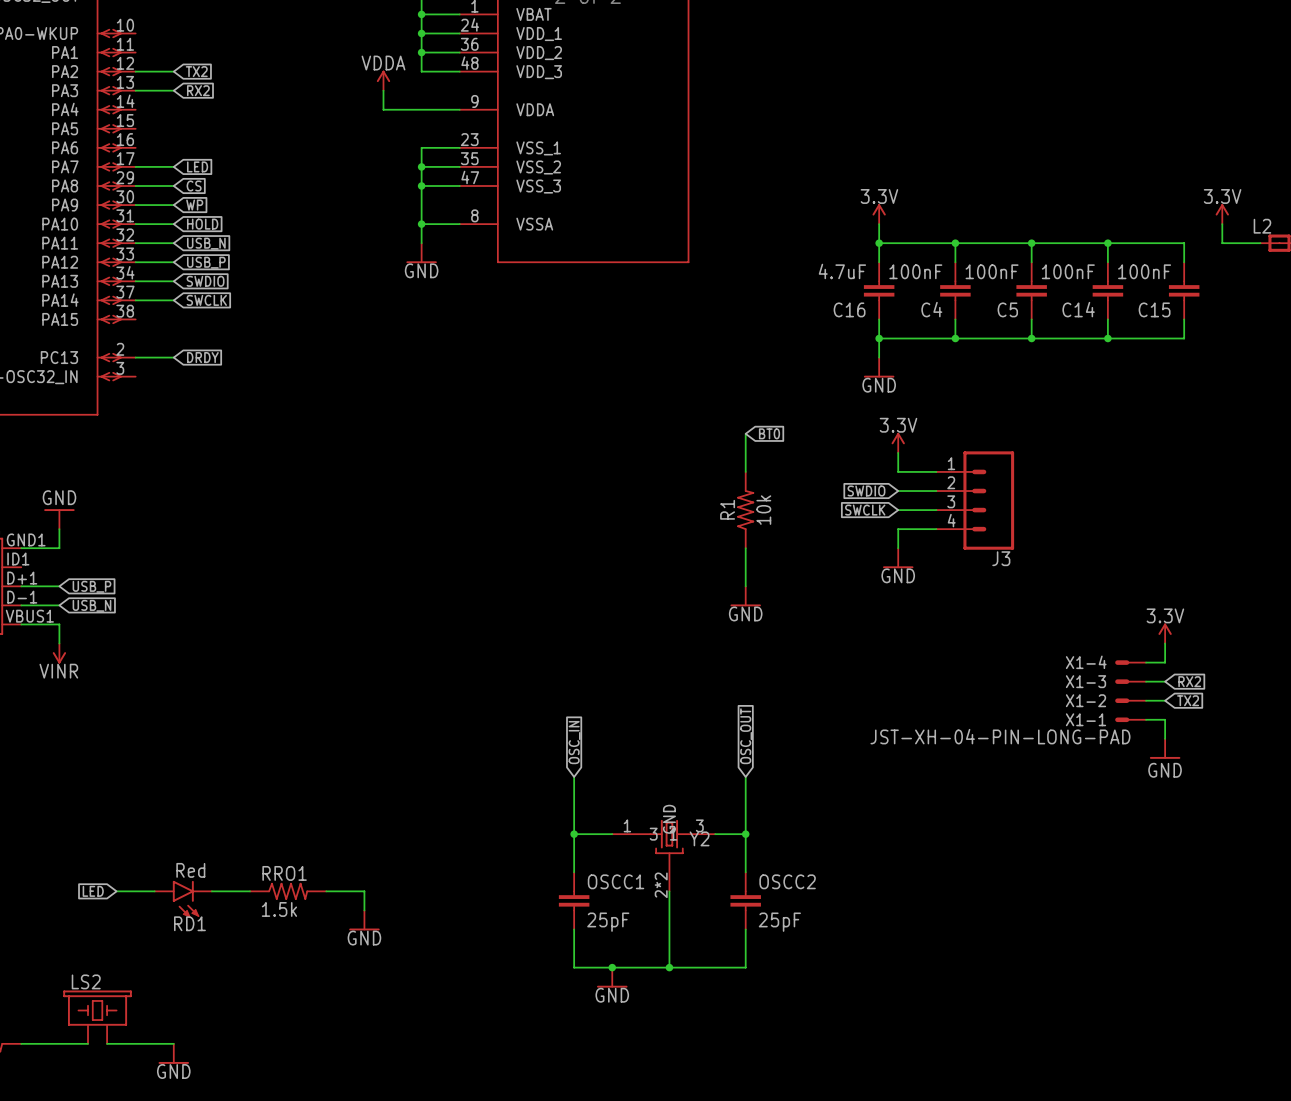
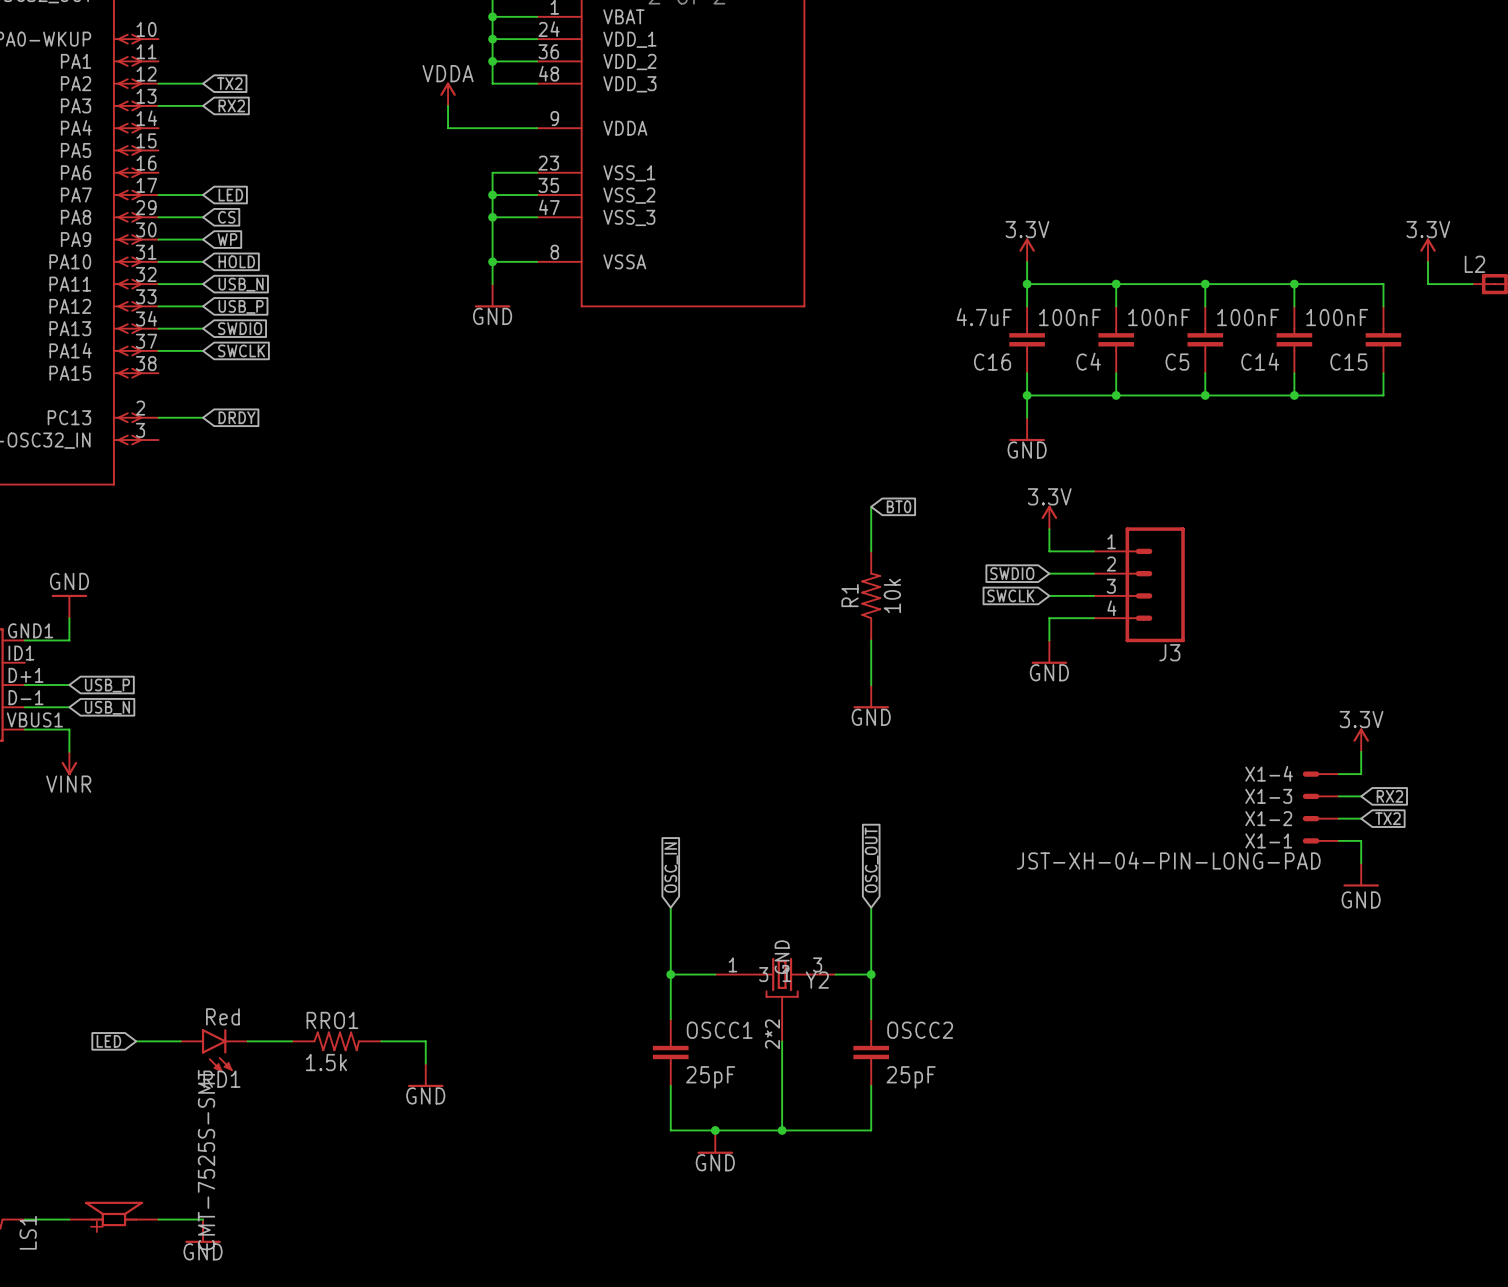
LS2: (97, 1017) -> none
LS1: none -> CMT-7525S-SMT (113, 1213)

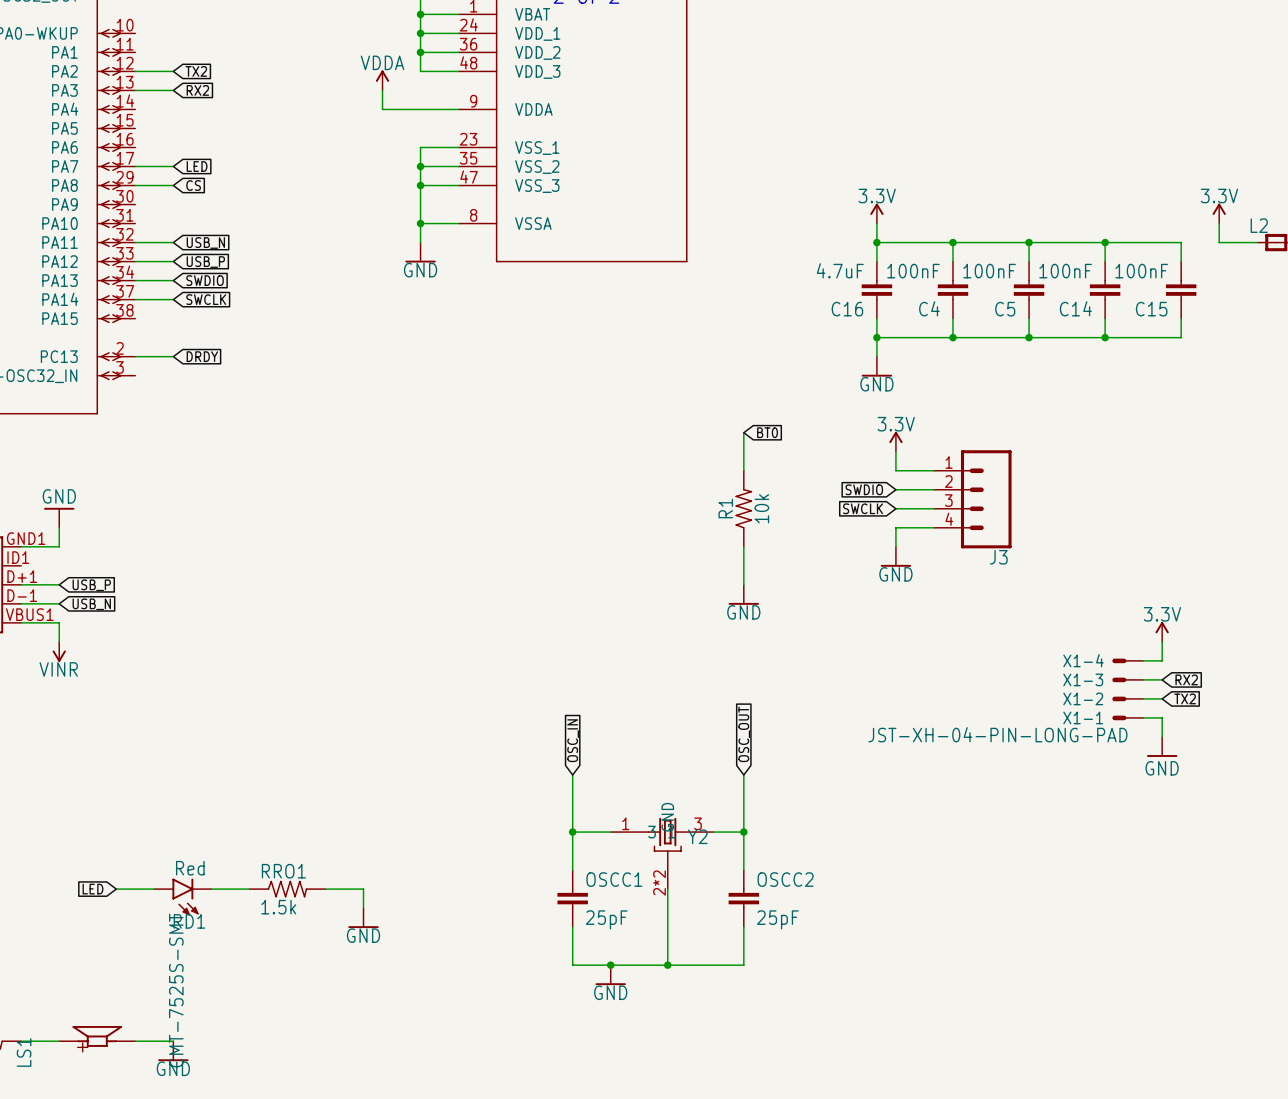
wire: (158, 239) (203, 239) -> none
global label: WP (227, 239) -> none
wire: (158, 261) (203, 261) -> none
global label: HOLD (236, 261) -> none

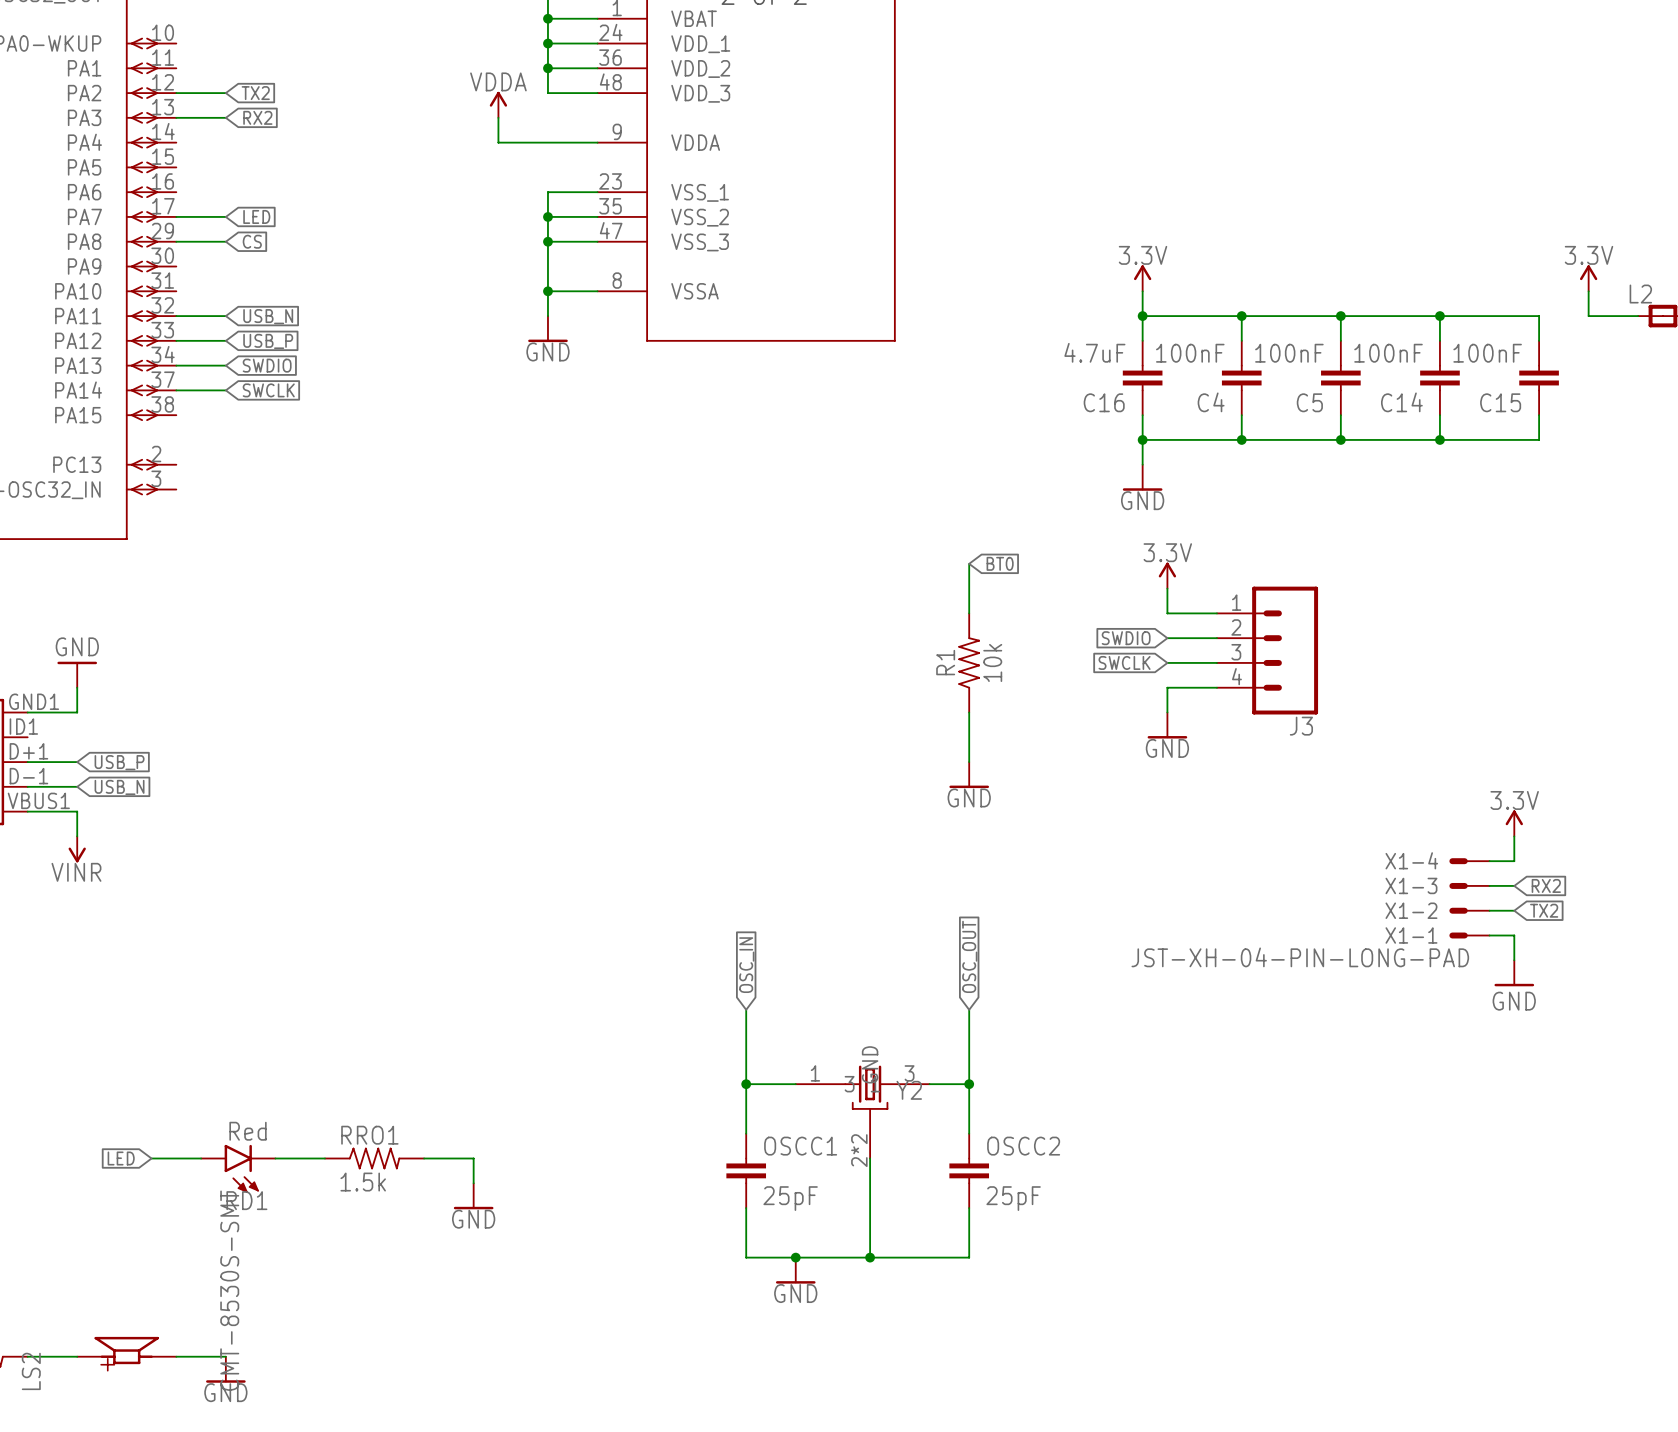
wire: (135, 356) (173, 356) -> none
global label: DRDY (202, 356) -> none
LS1 value: CMT-7525S-SMT (176, 990) -> CMT-8530S-SMT (229, 1290)
LS1 name: LS1 (24, 1052) -> LS2 (31, 1371)

